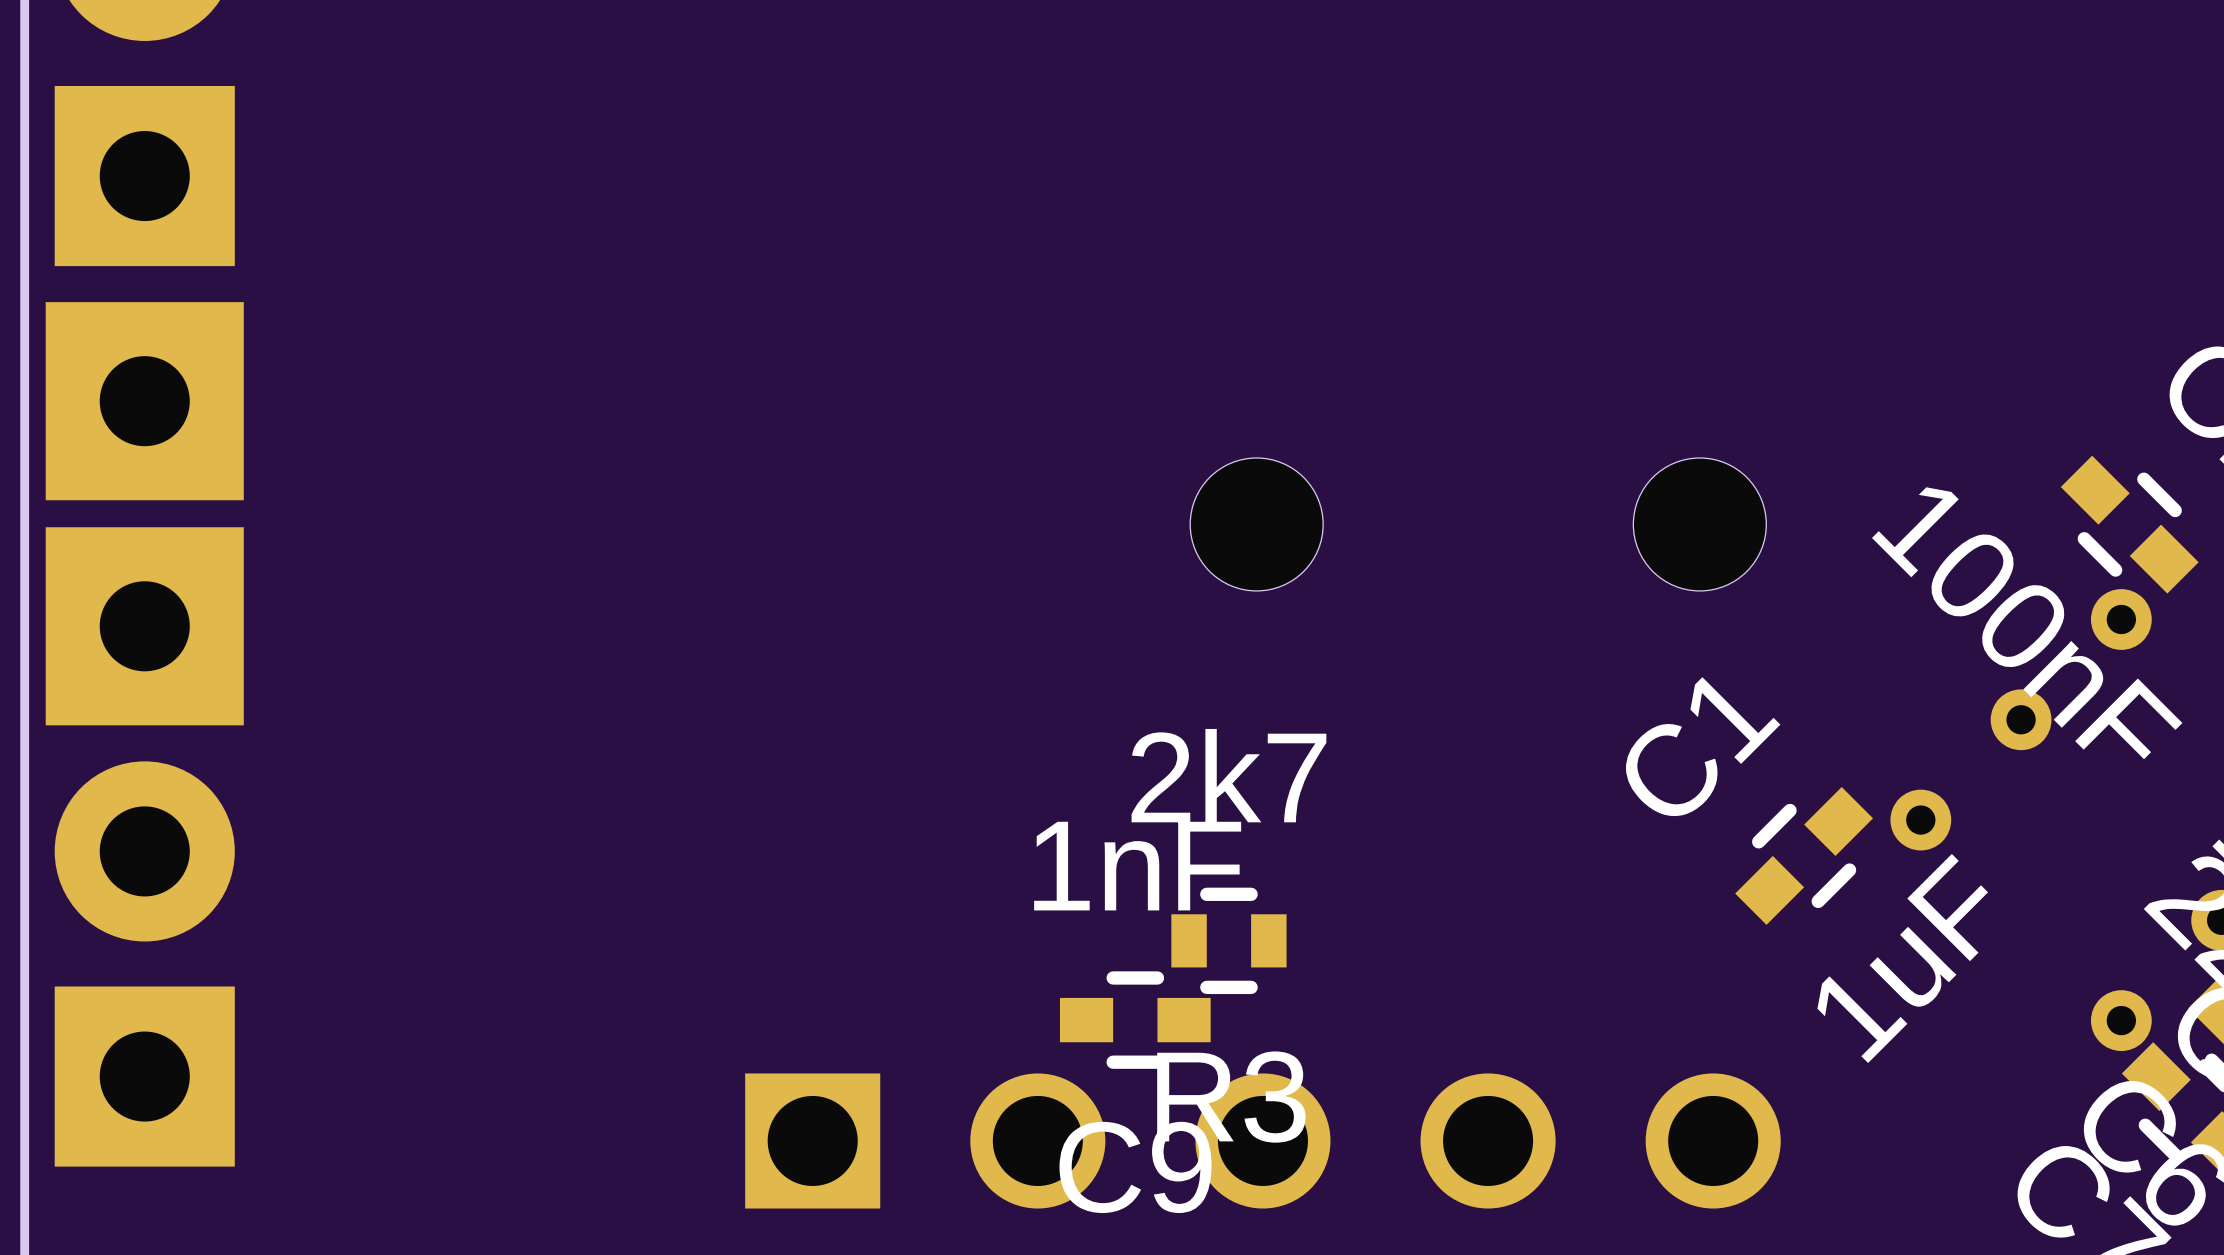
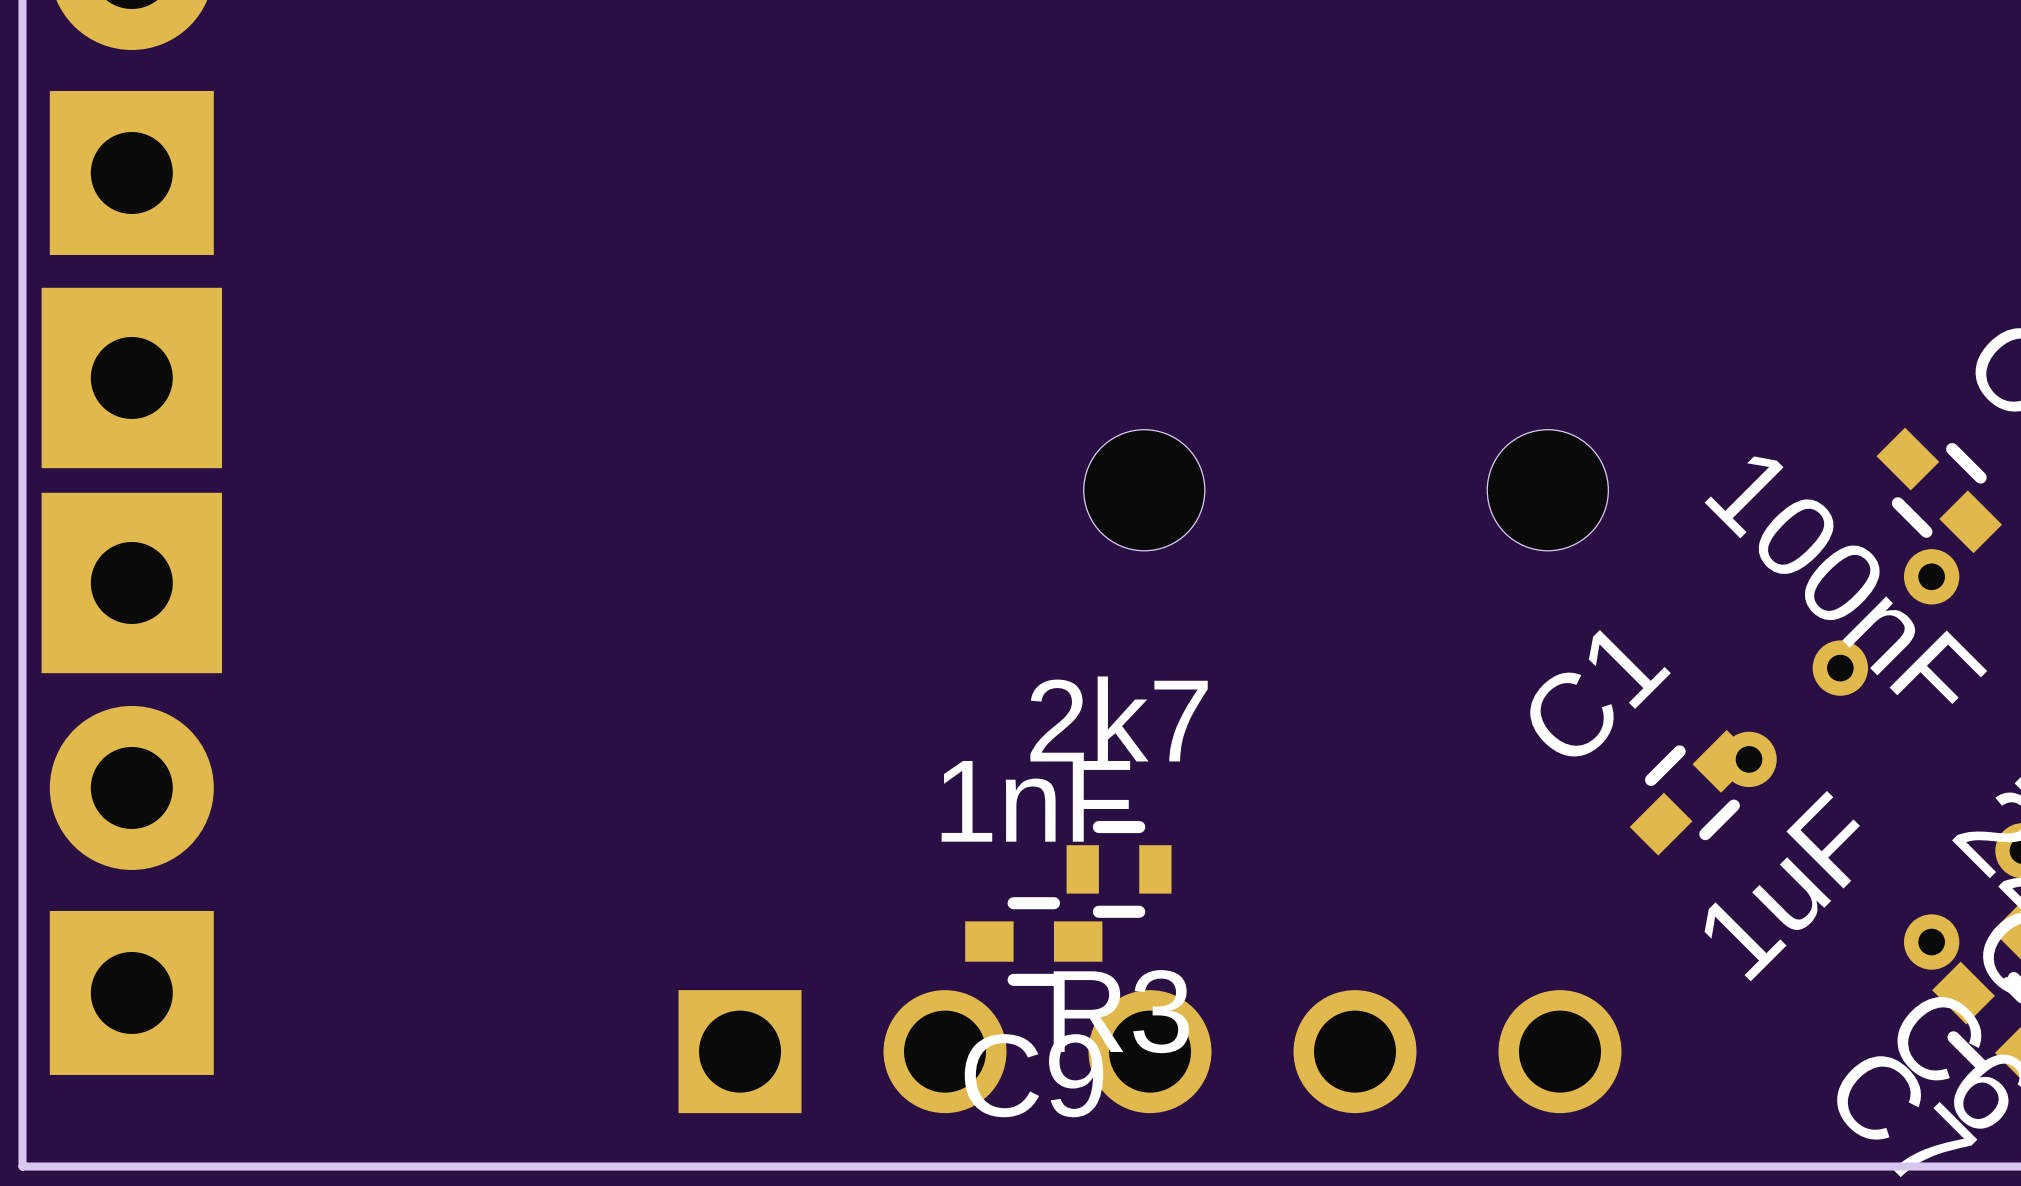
C1 position: (1804, 855) -> (1692, 792)

